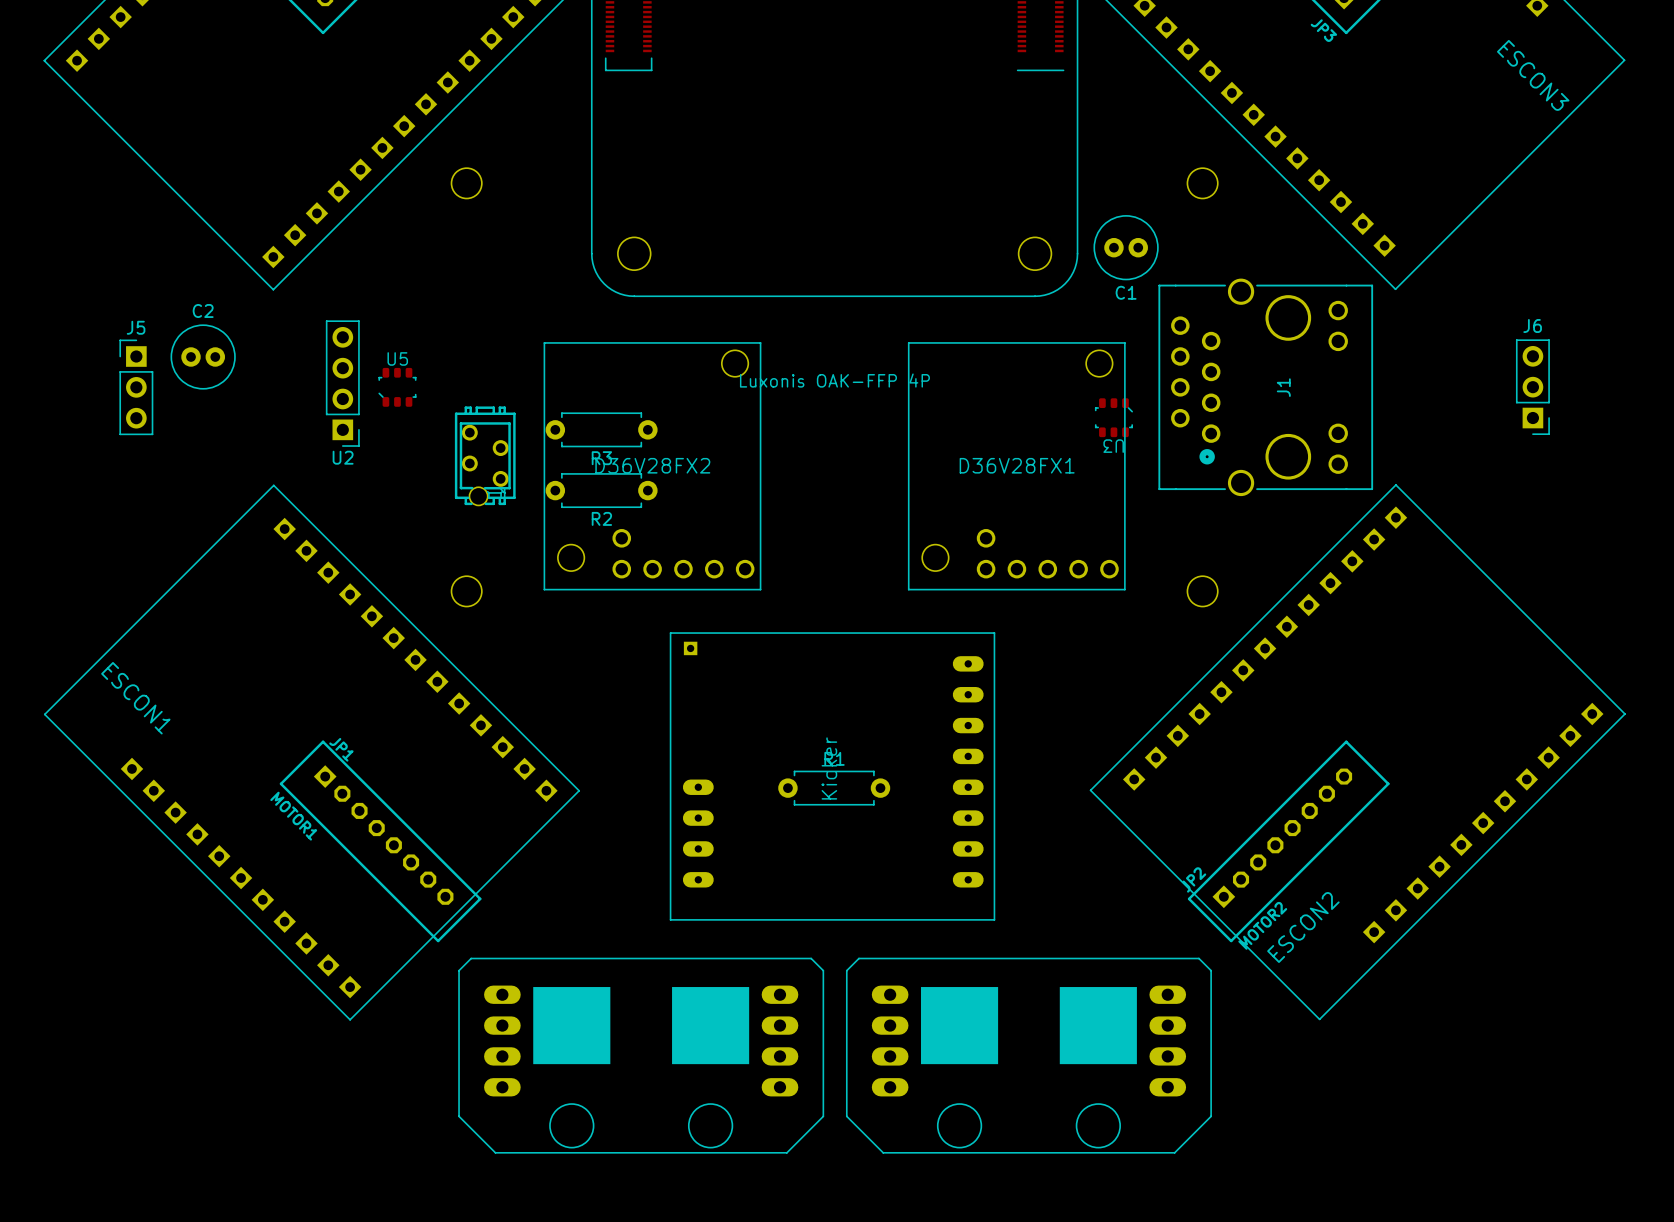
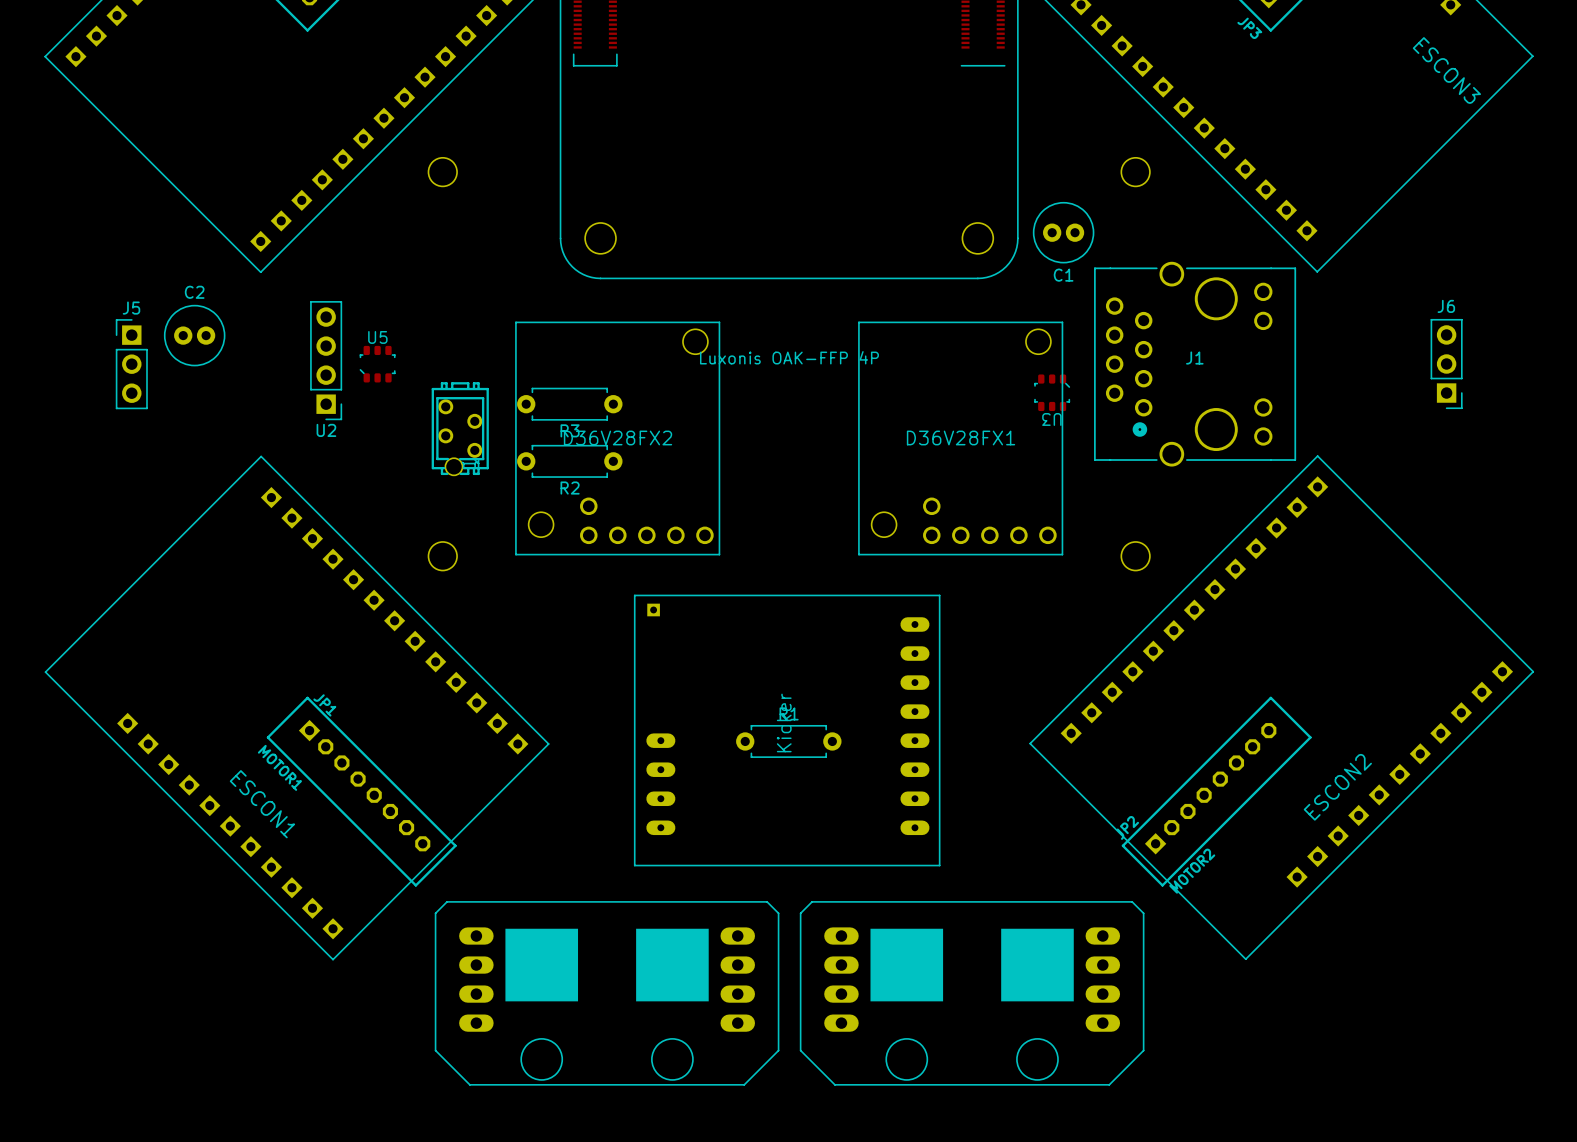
J1 name rotation: 0° (1283, 387) -> 90° clockwise (1194, 358)
ESCON1 name position: ESCON1 (135, 698) -> ESCON1 (262, 804)
ESCON2 name position: ESCON2 (1303, 927) -> ESCON2 (1337, 787)

